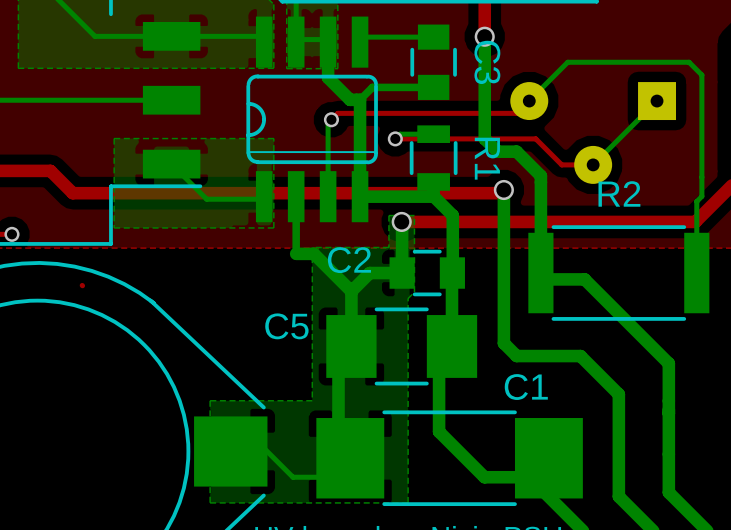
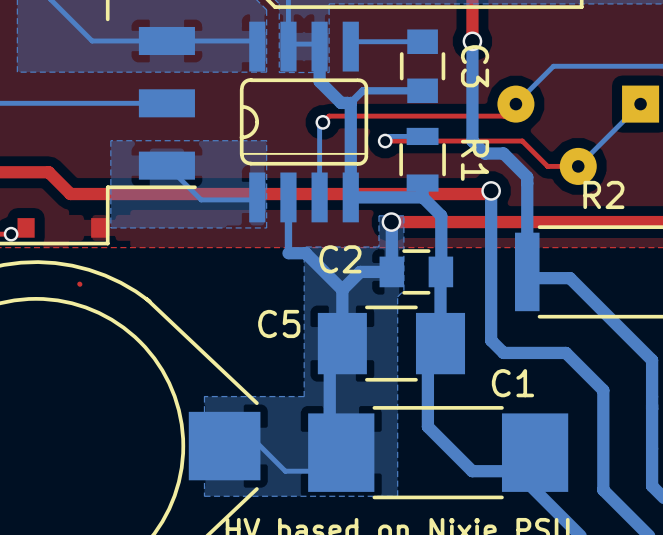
part: none -> (62, 227)

